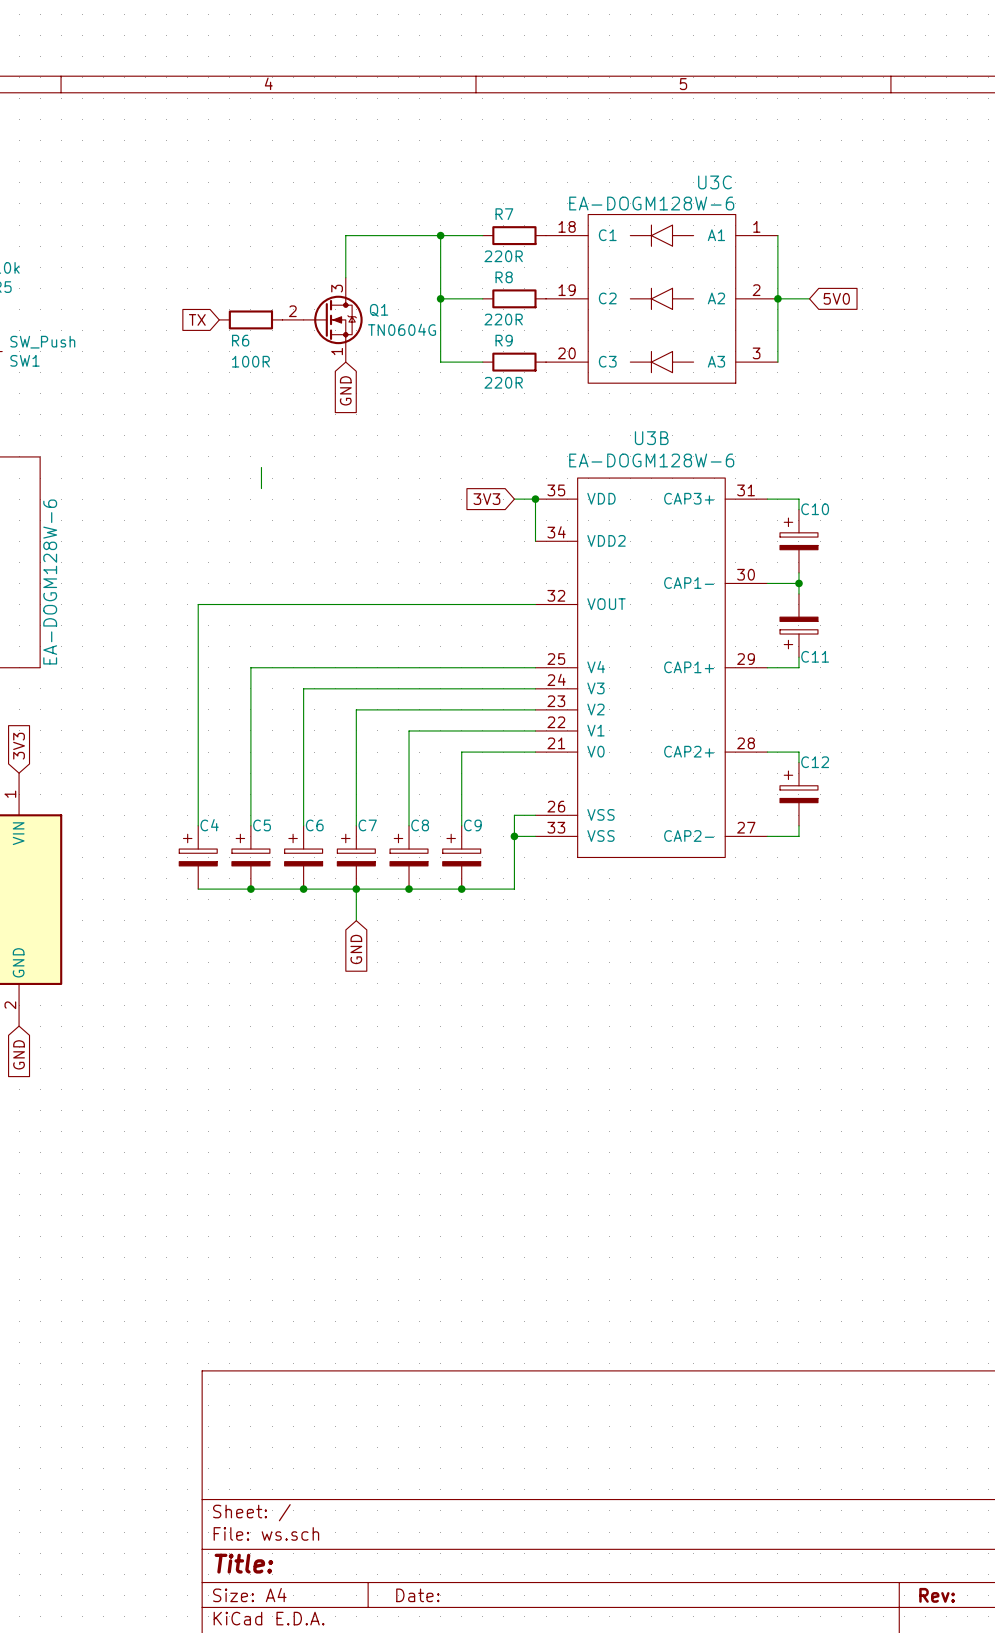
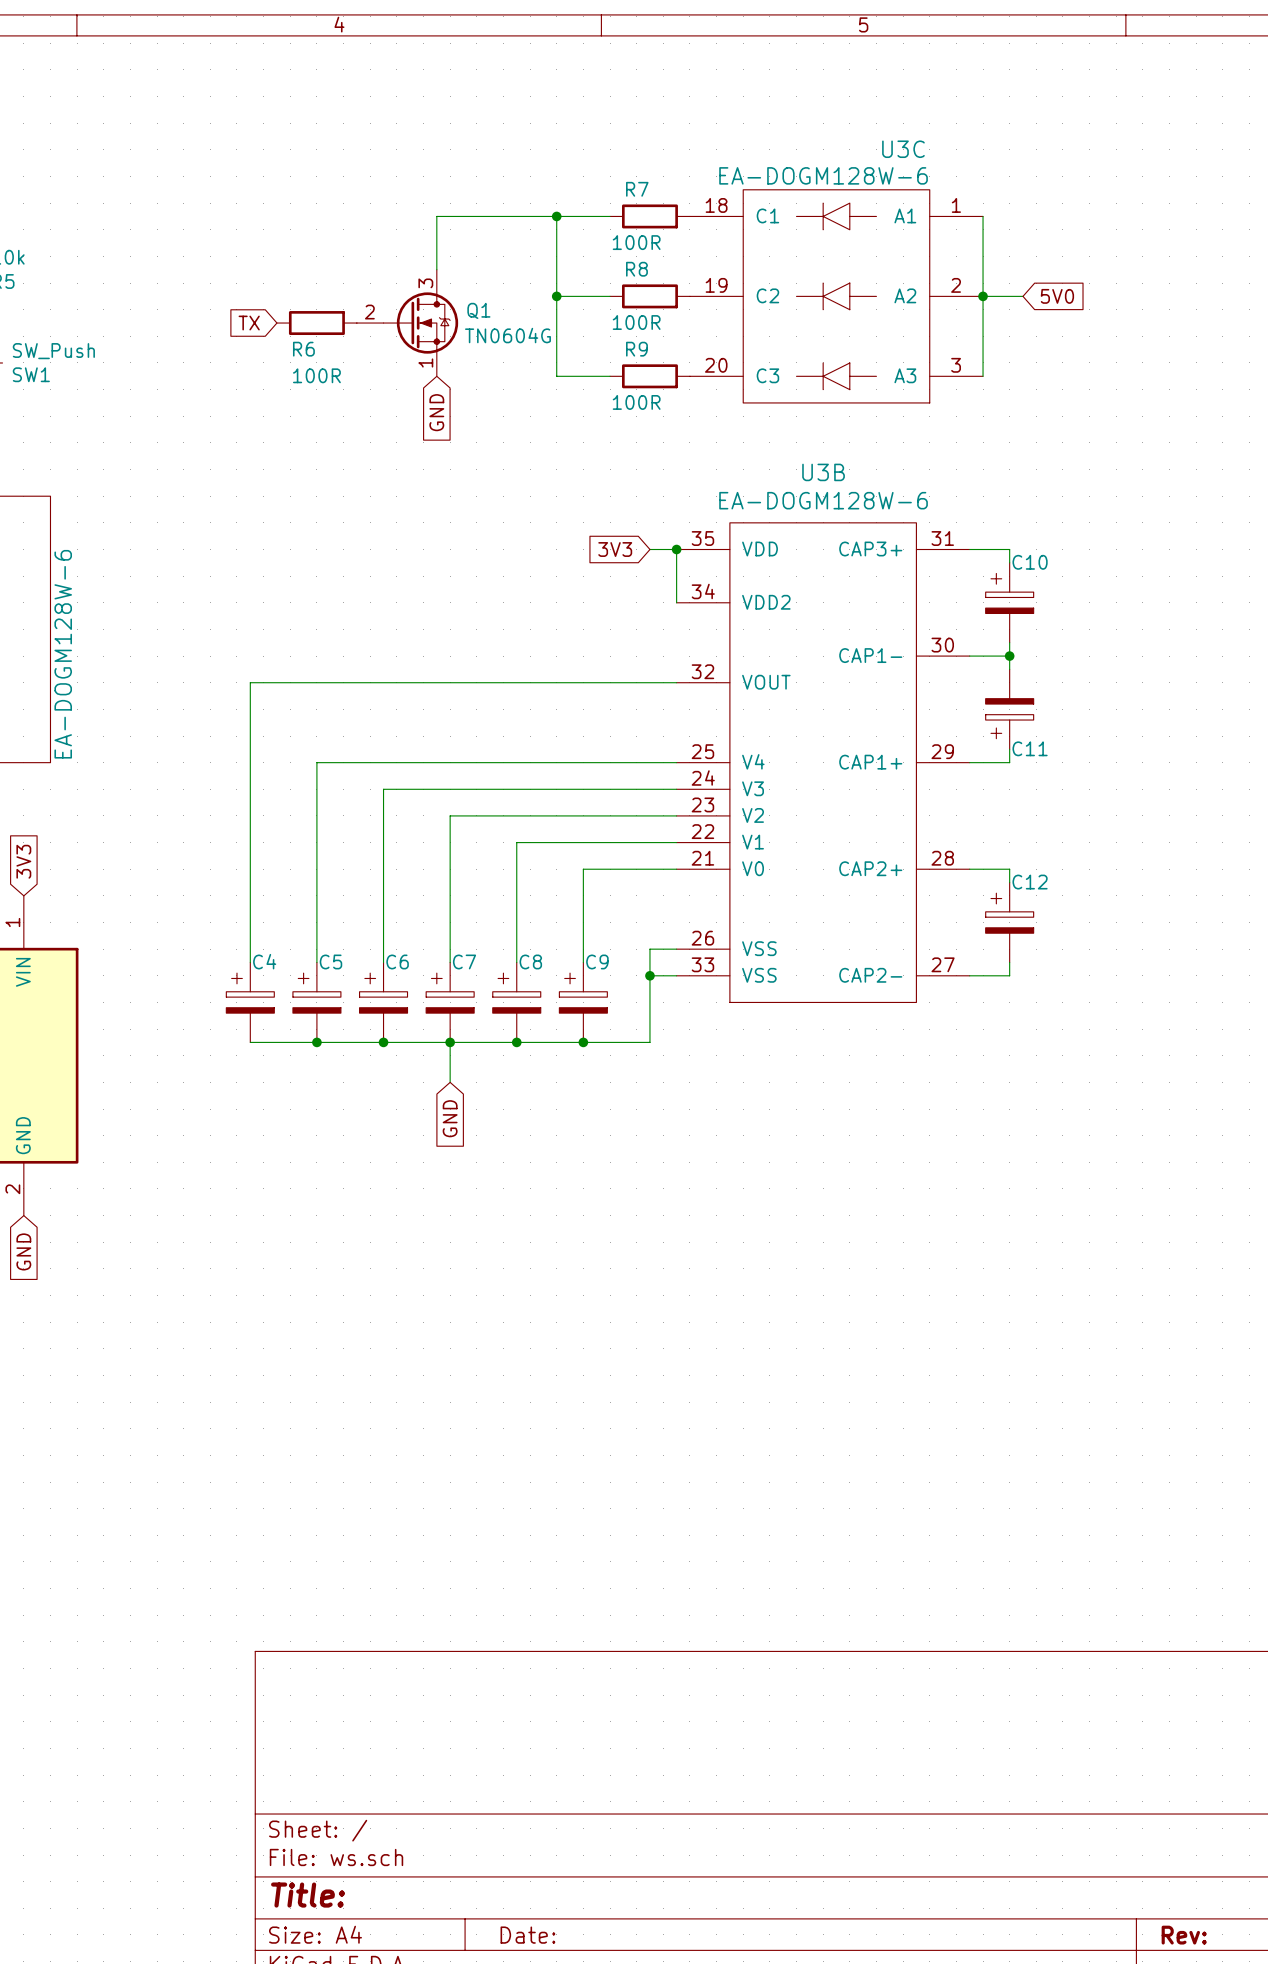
R7 value: 220R (503, 256) -> 100R (636, 242)
R8 value: 220R (503, 319) -> 100R (636, 322)
R9 value: 220R (503, 382) -> 100R (636, 402)
wire: (261, 467) (261, 488) -> none

